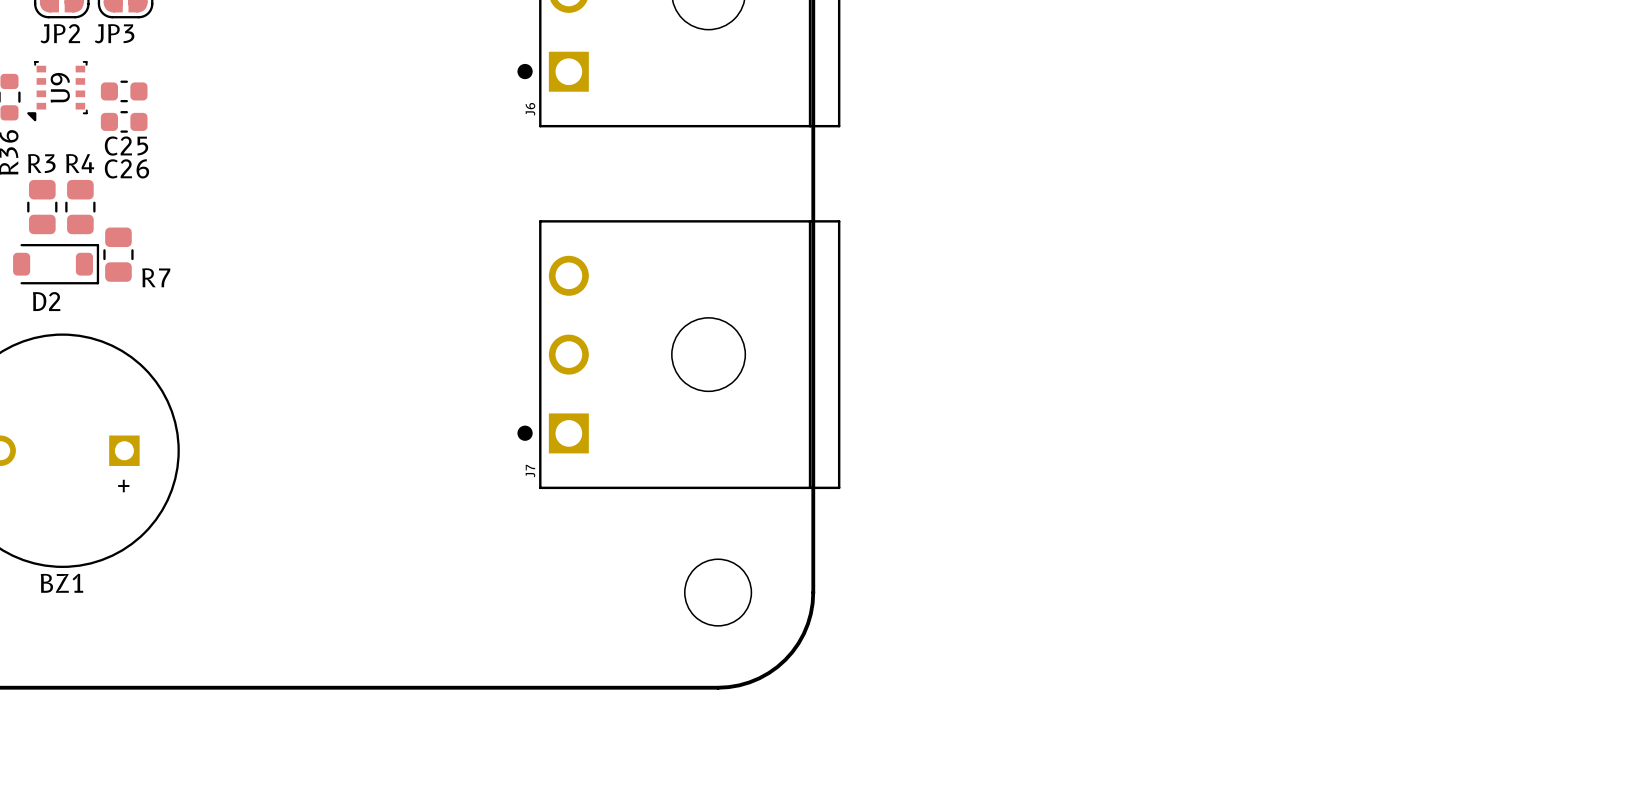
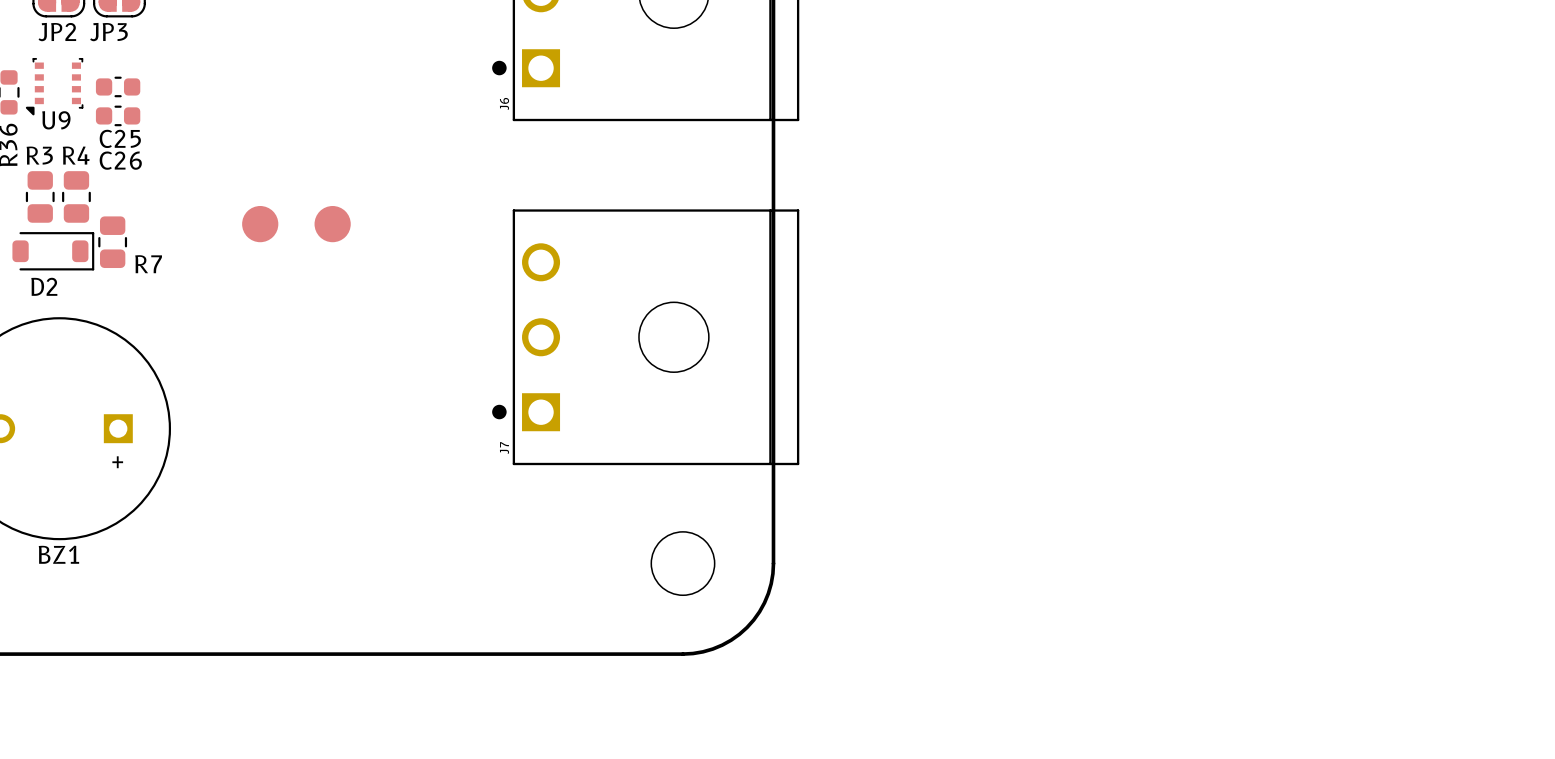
U9 name rotation: 0° (60, 87) -> 90° clockwise (56, 120)
part: none -> (296, 224)

